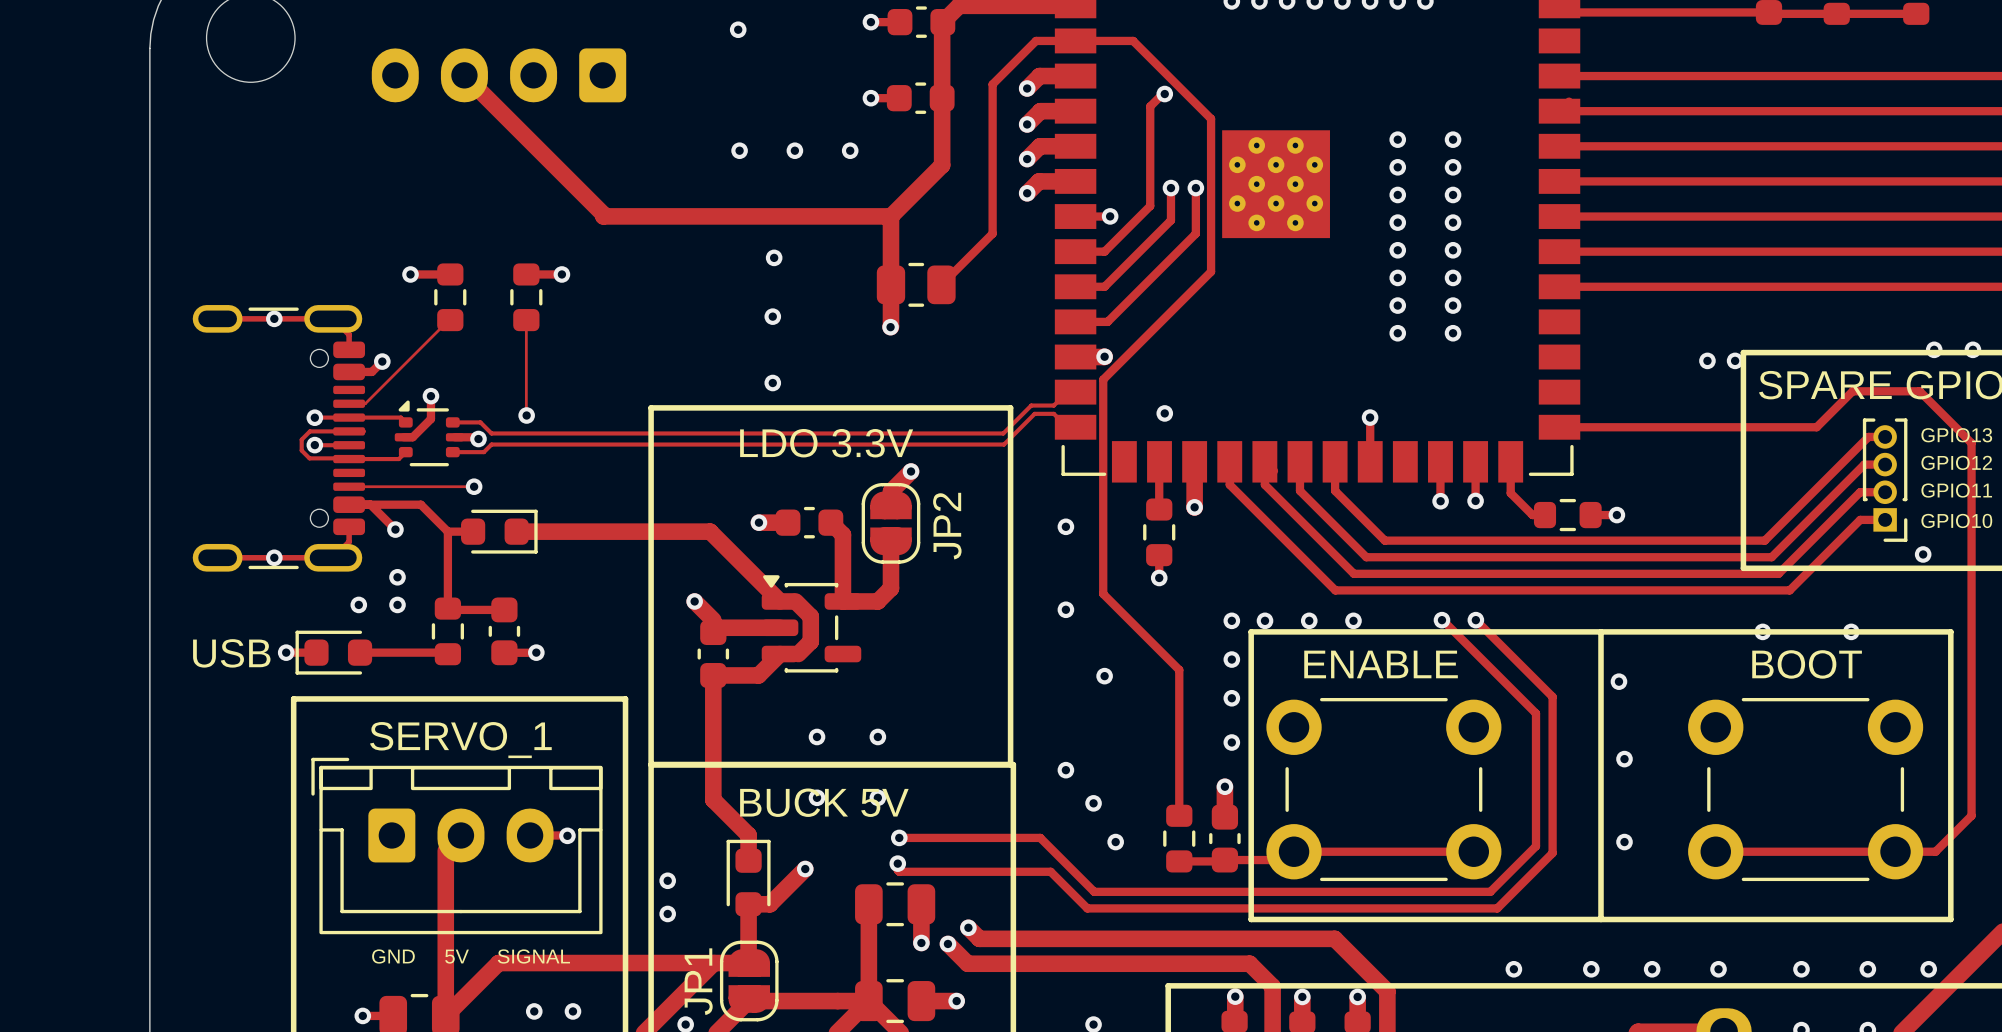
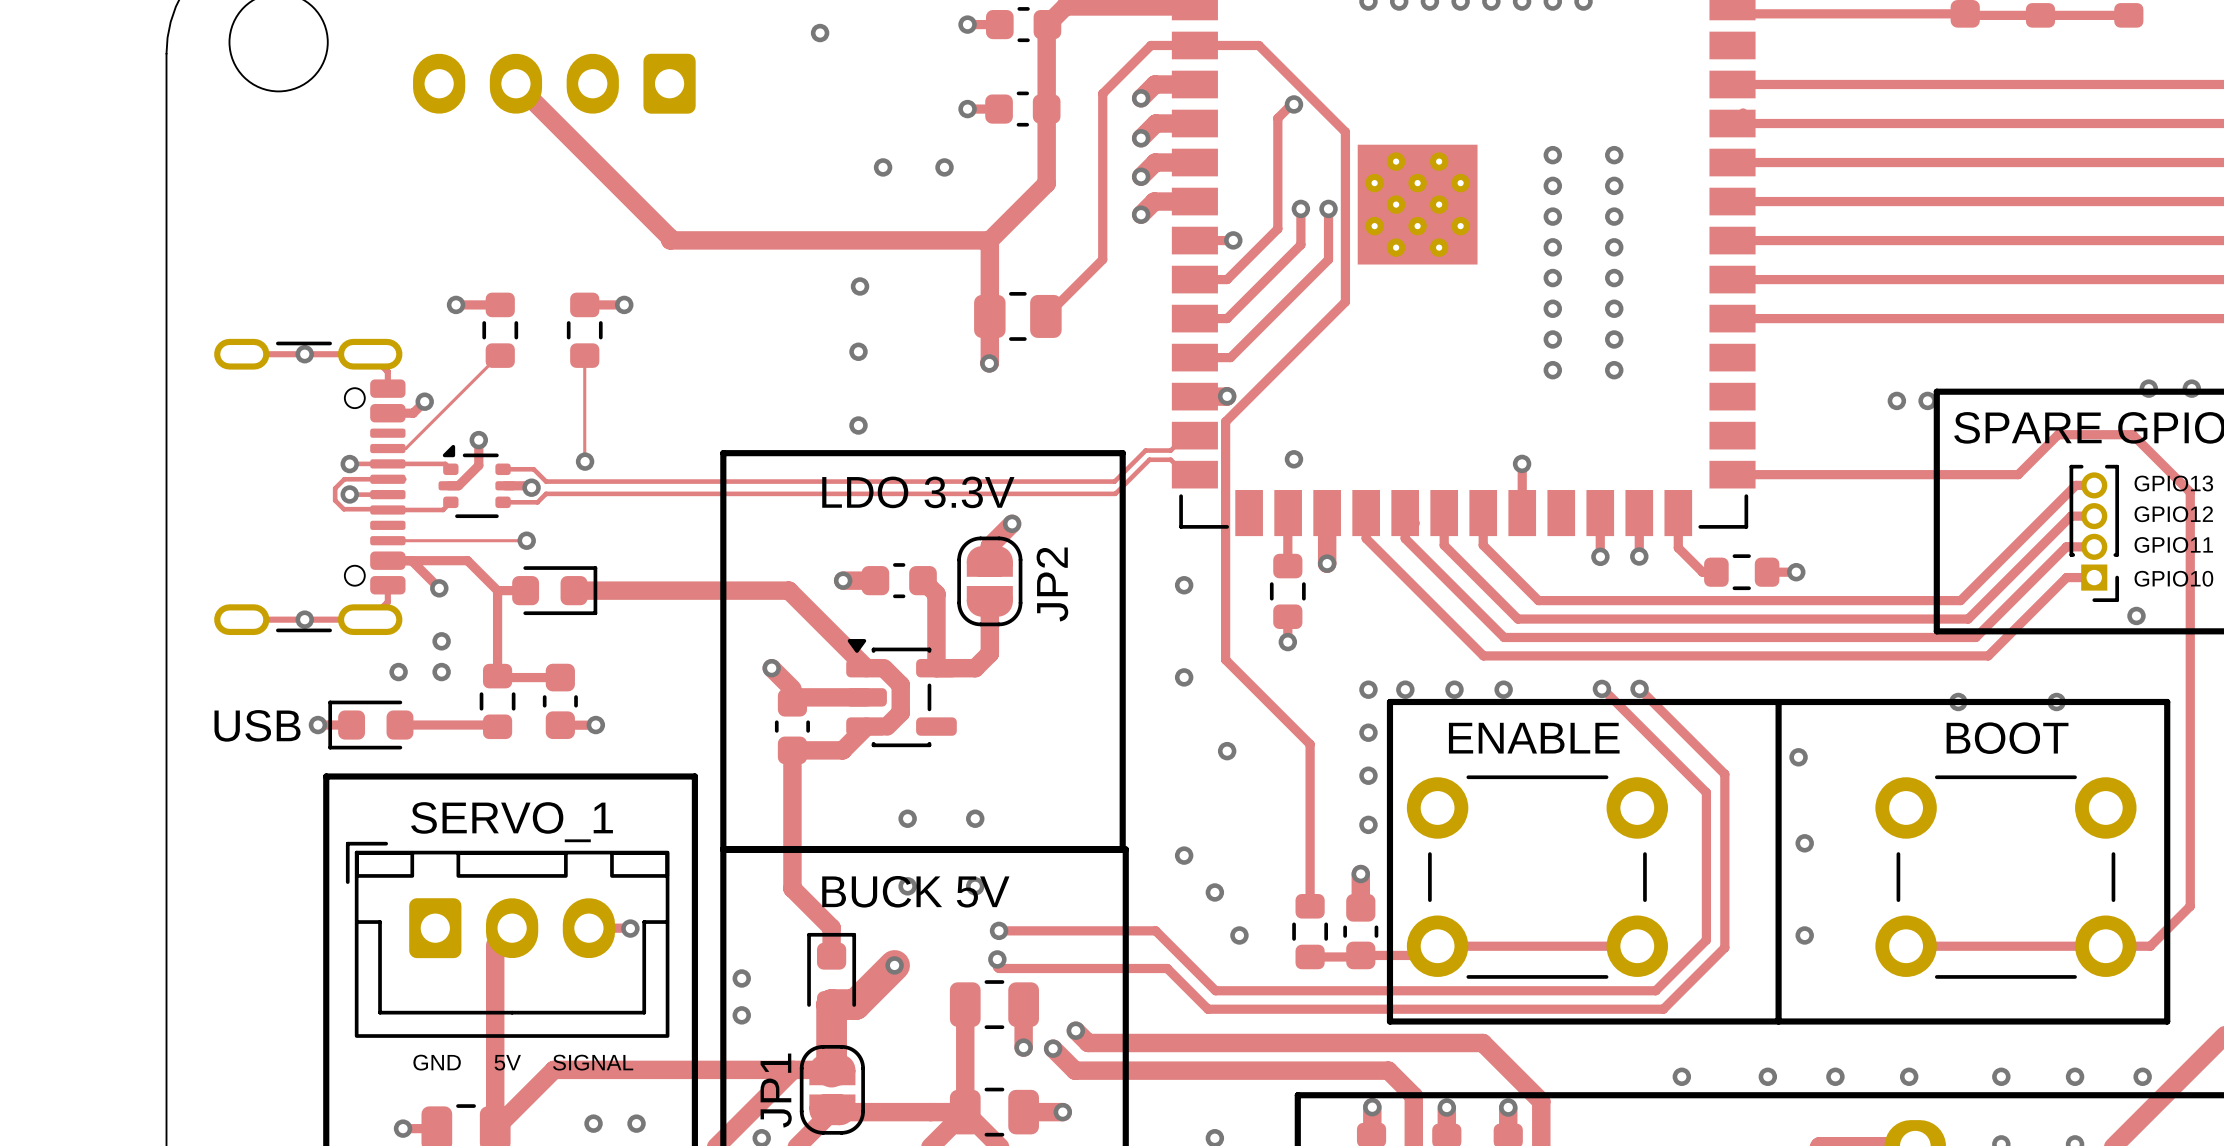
via: (739, 150) -> none
track width: thin (805, 869) (770, 904) (748, 904) (748, 965) -> thick (894, 965) (855, 1004) (831, 1004) (831, 1072)

